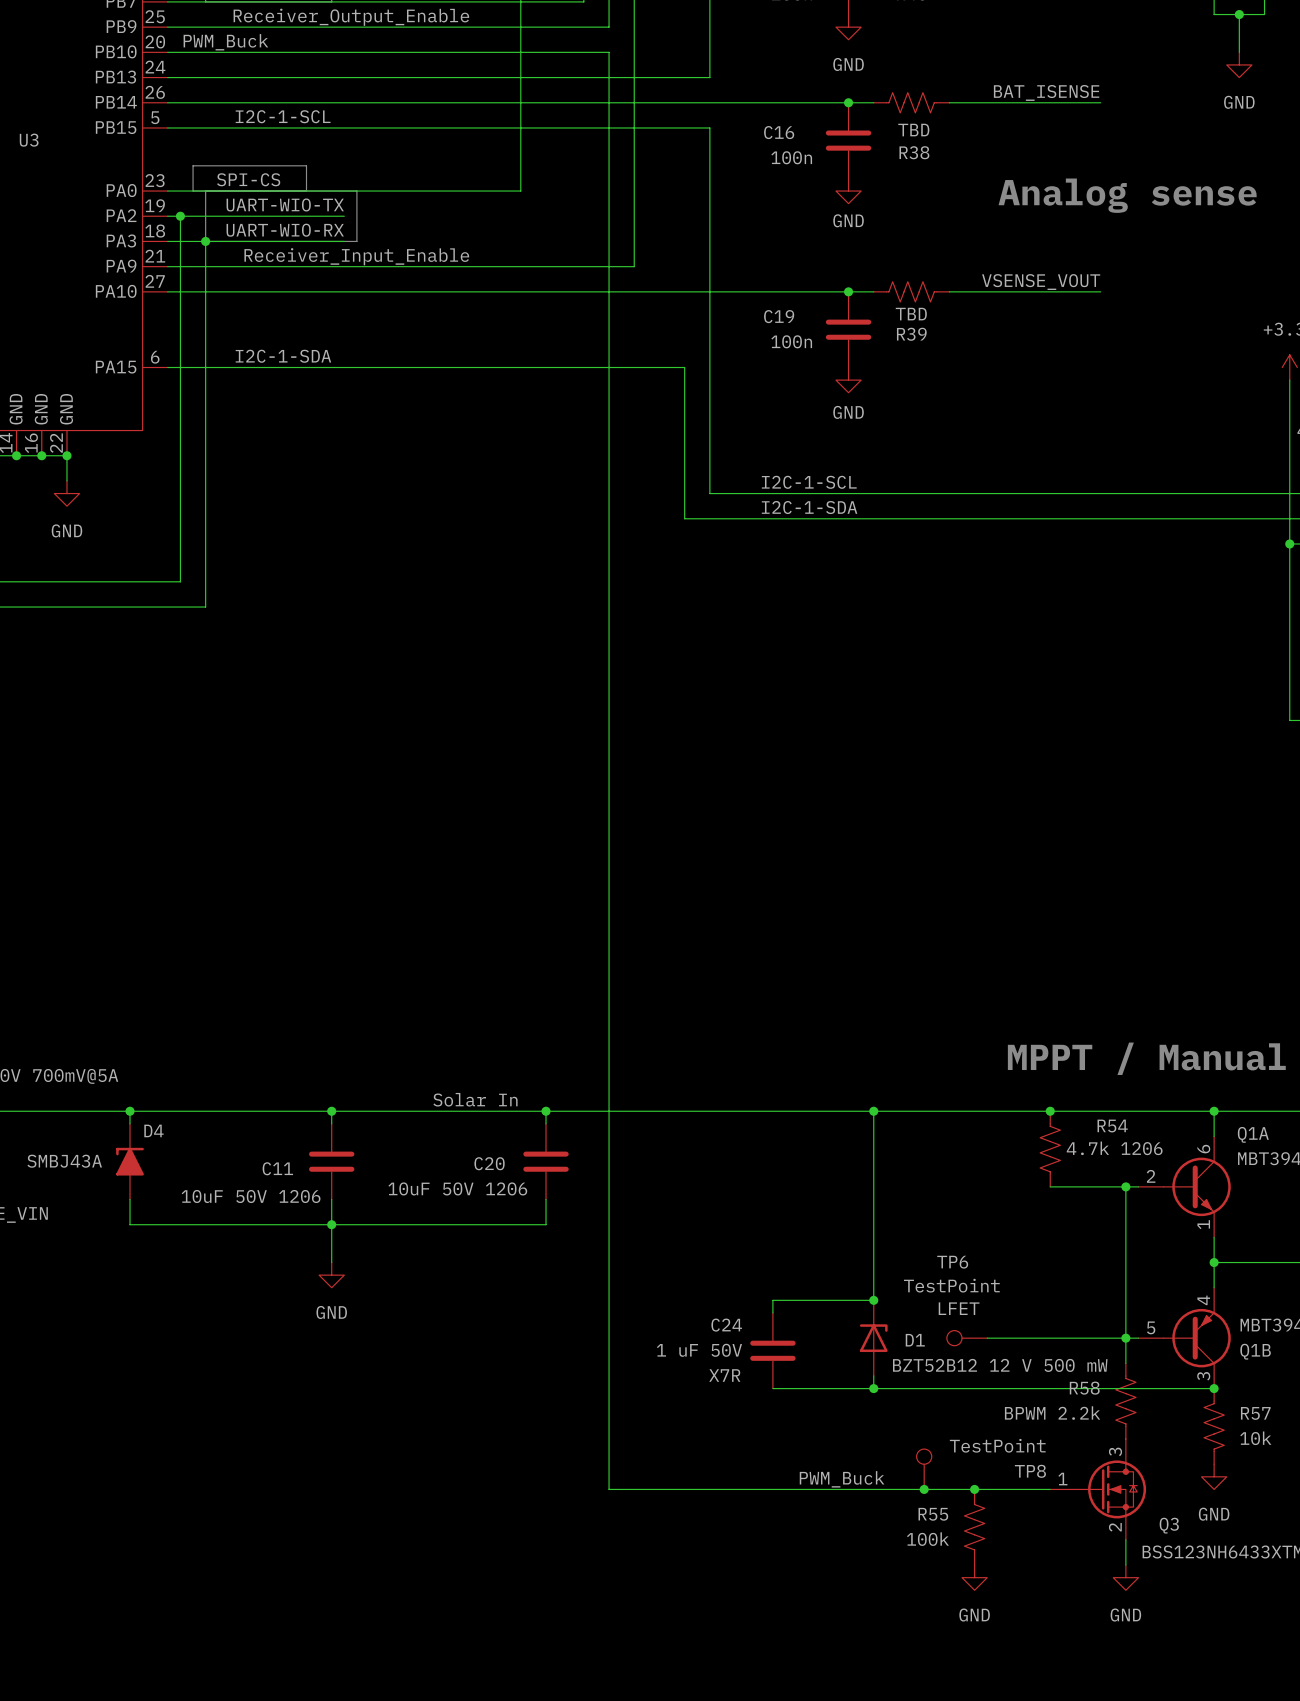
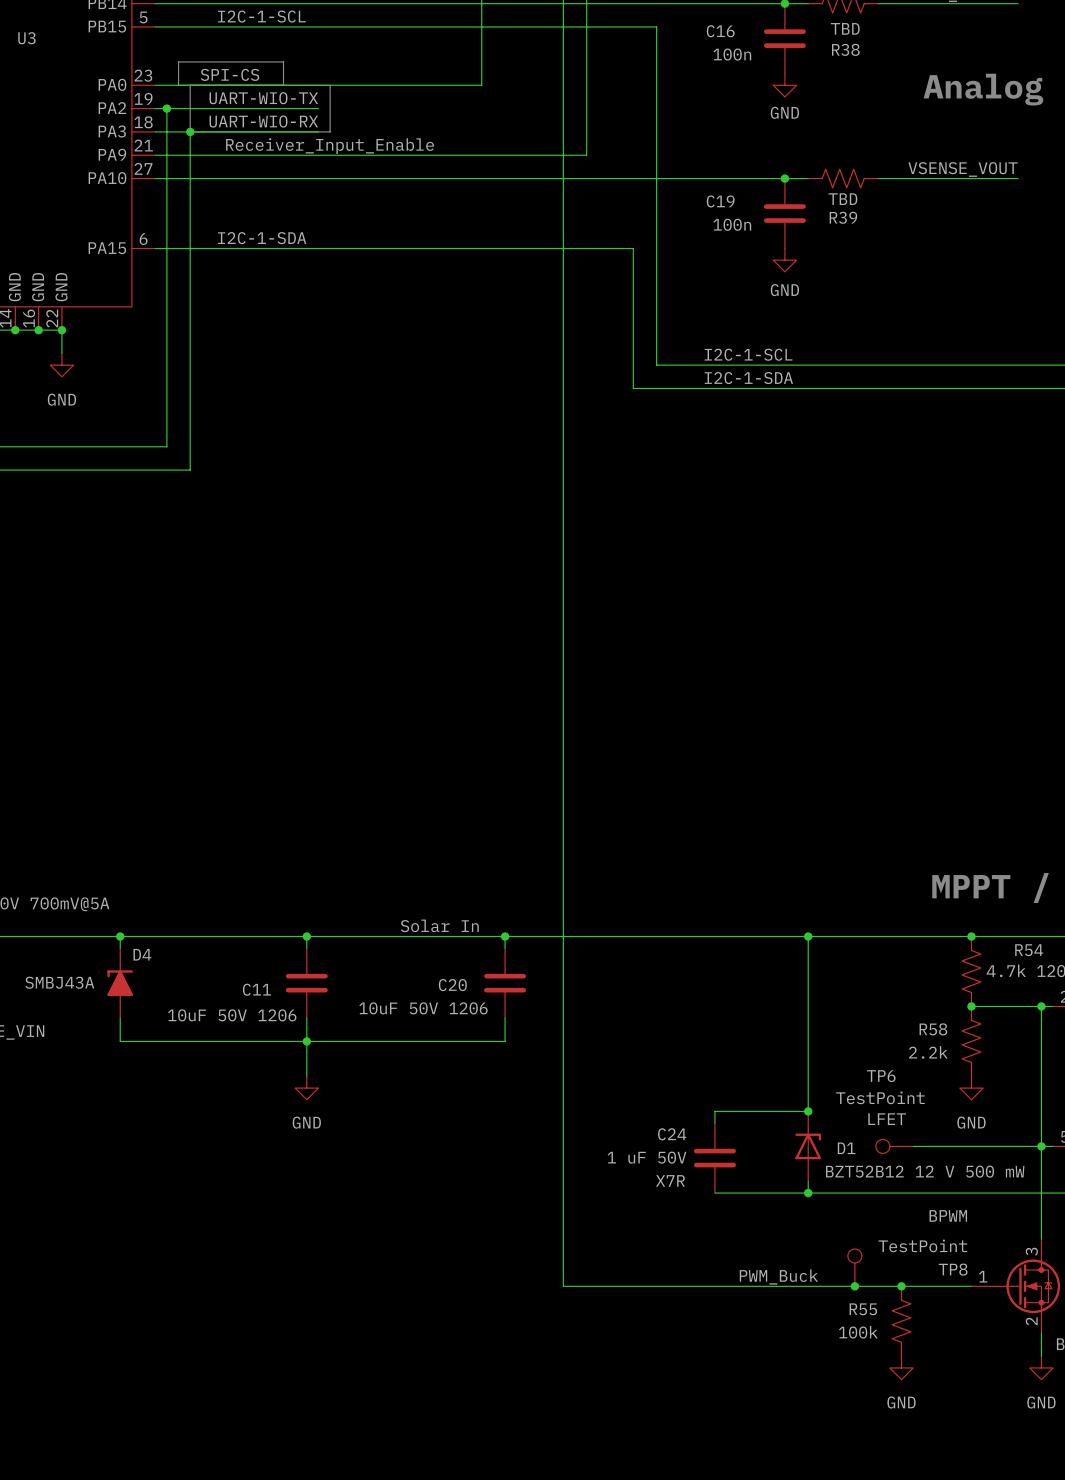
junction: none -> (971, 1006)
power symbol: none -> GND (971, 1088)
R58 position: (1125, 1401) -> (971, 1041)

